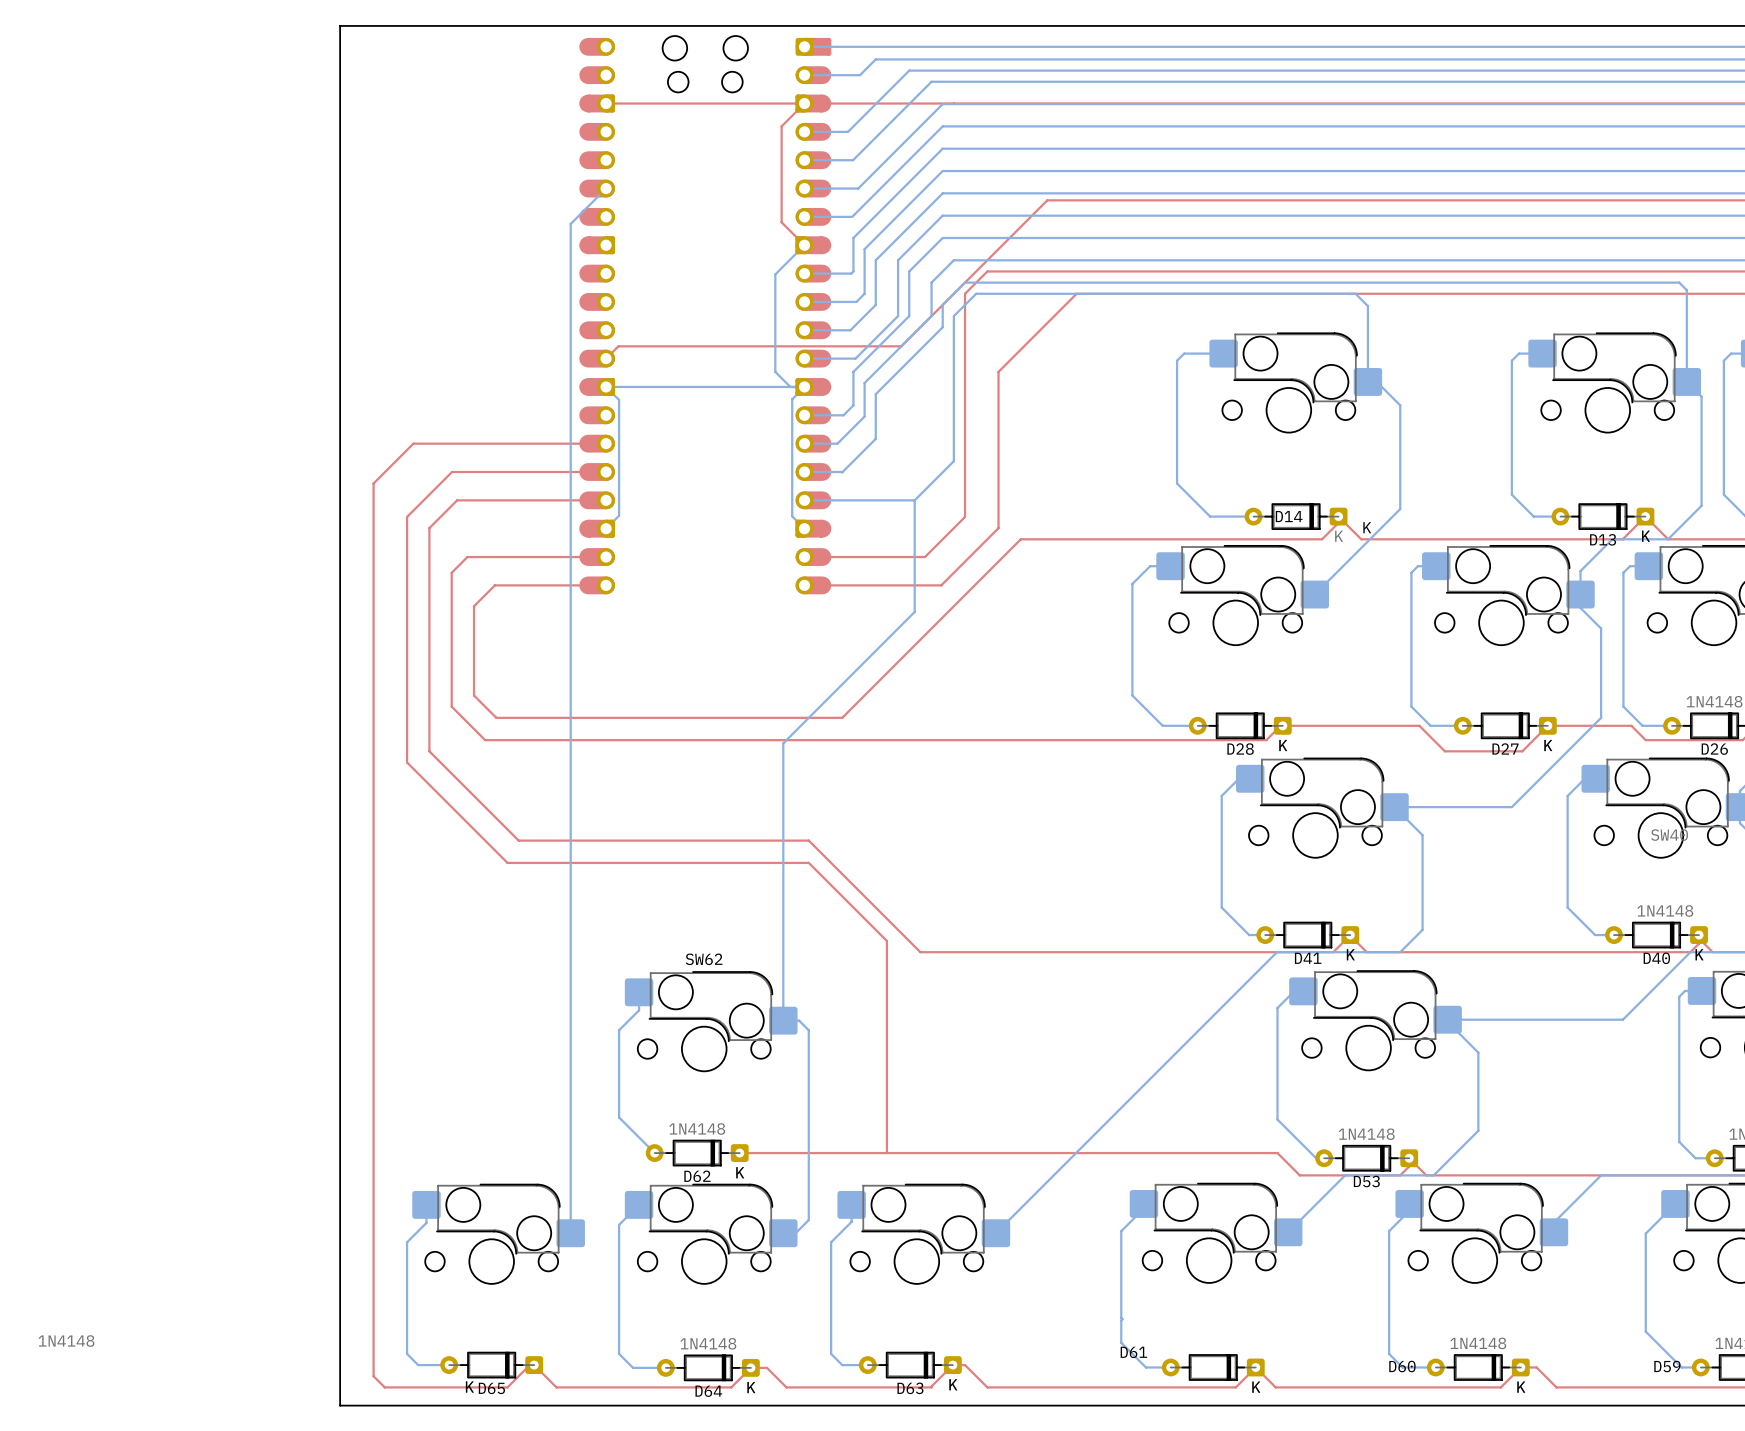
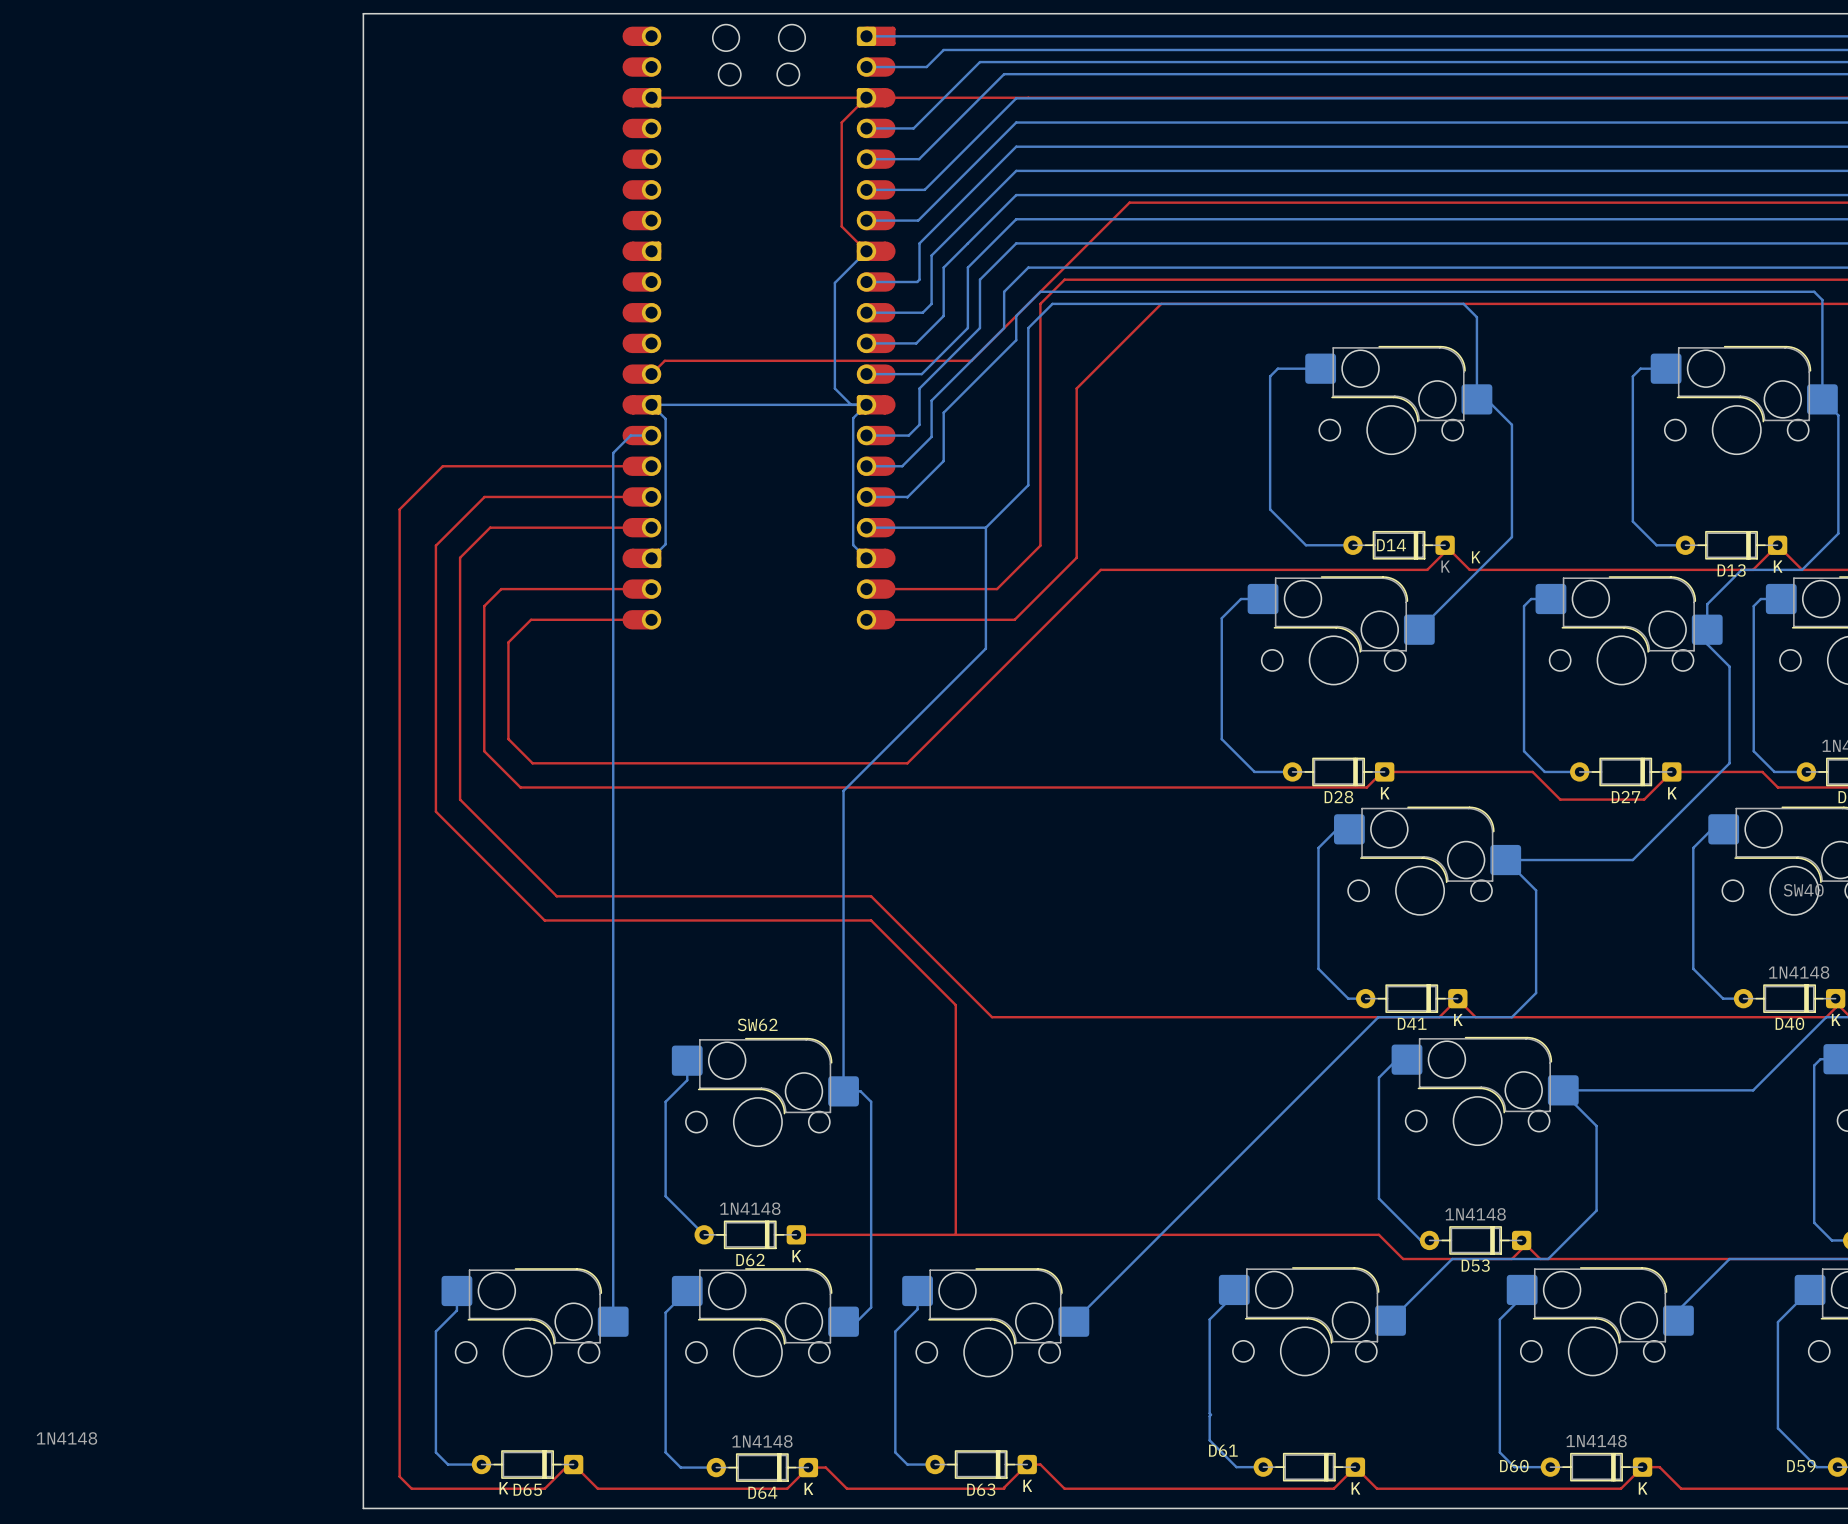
bottom track: (606, 188) (570, 223) (570, 431) -> (651, 435) (630, 435) (613, 453)

